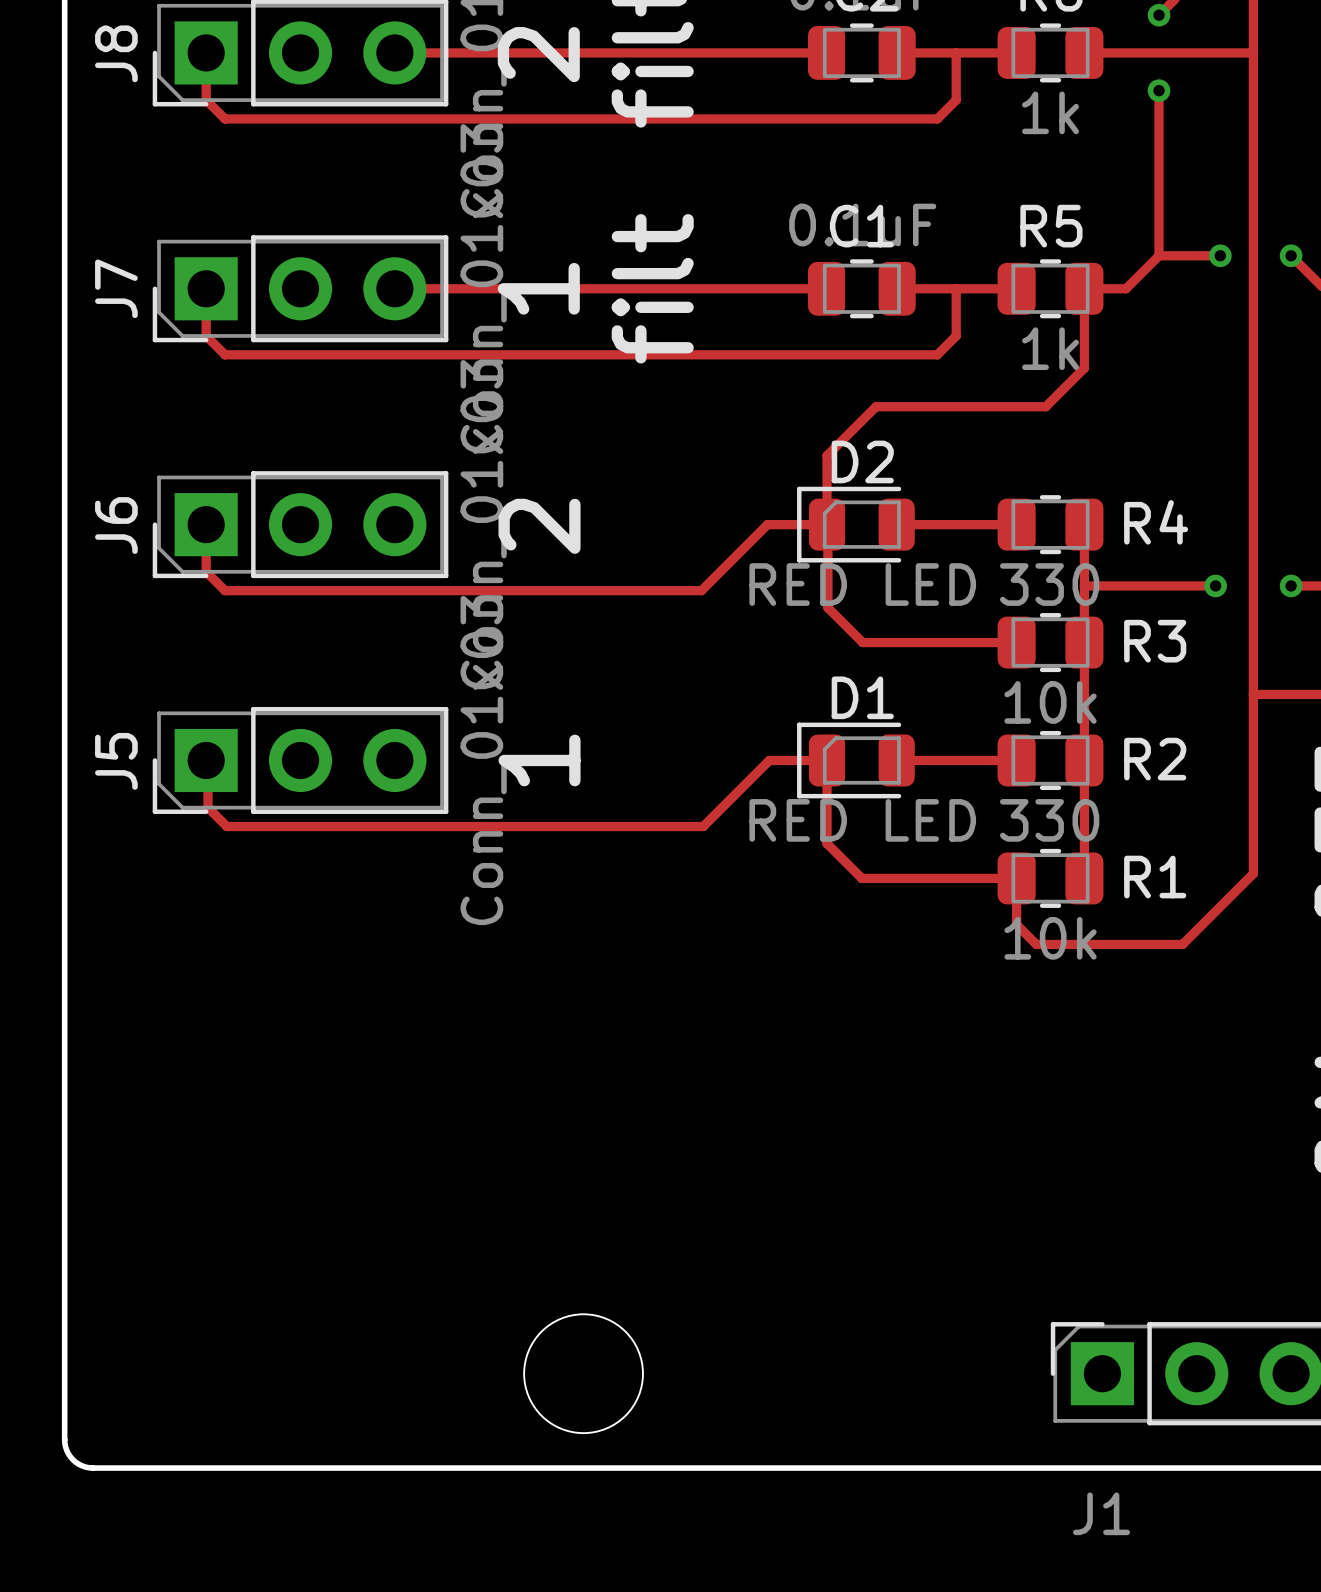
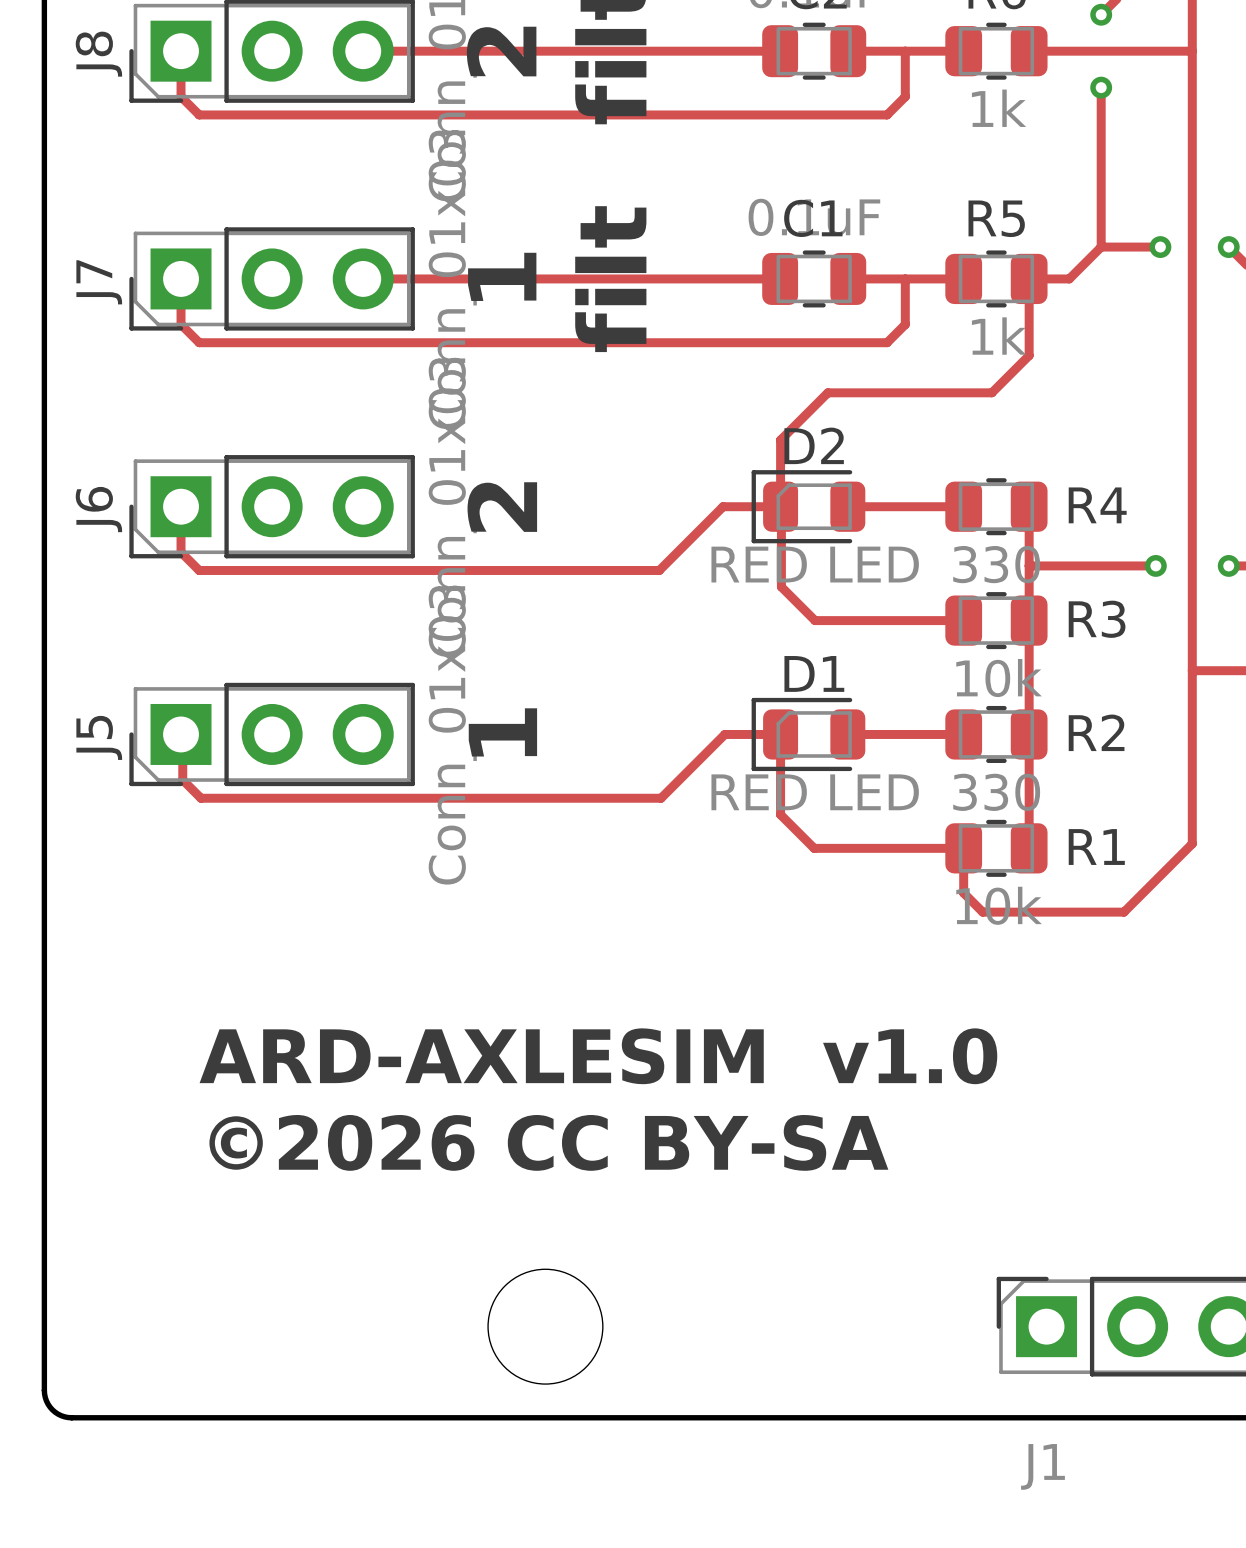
text: none -> ARD-AXLESIM v1.0 (598, 1056)
text: none -> ©2026 CC BY-SA (548, 1142)

